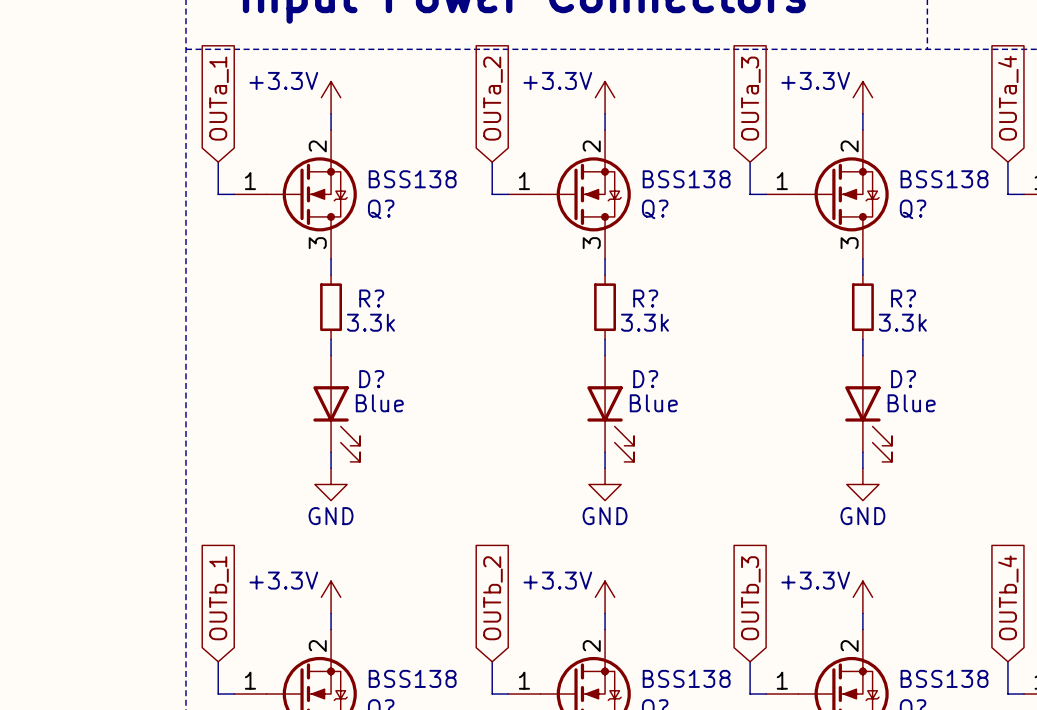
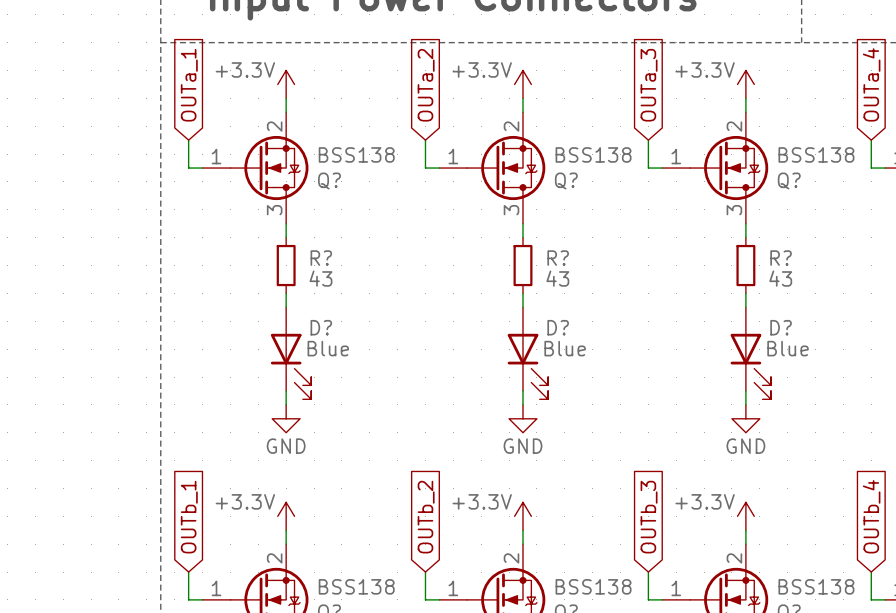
R? value: 3.3k (370, 322) -> 43 (320, 278)
R? value: 3.3k (644, 322) -> 43 (557, 278)
R? value: 3.3k (902, 322) -> 43 (780, 278)

